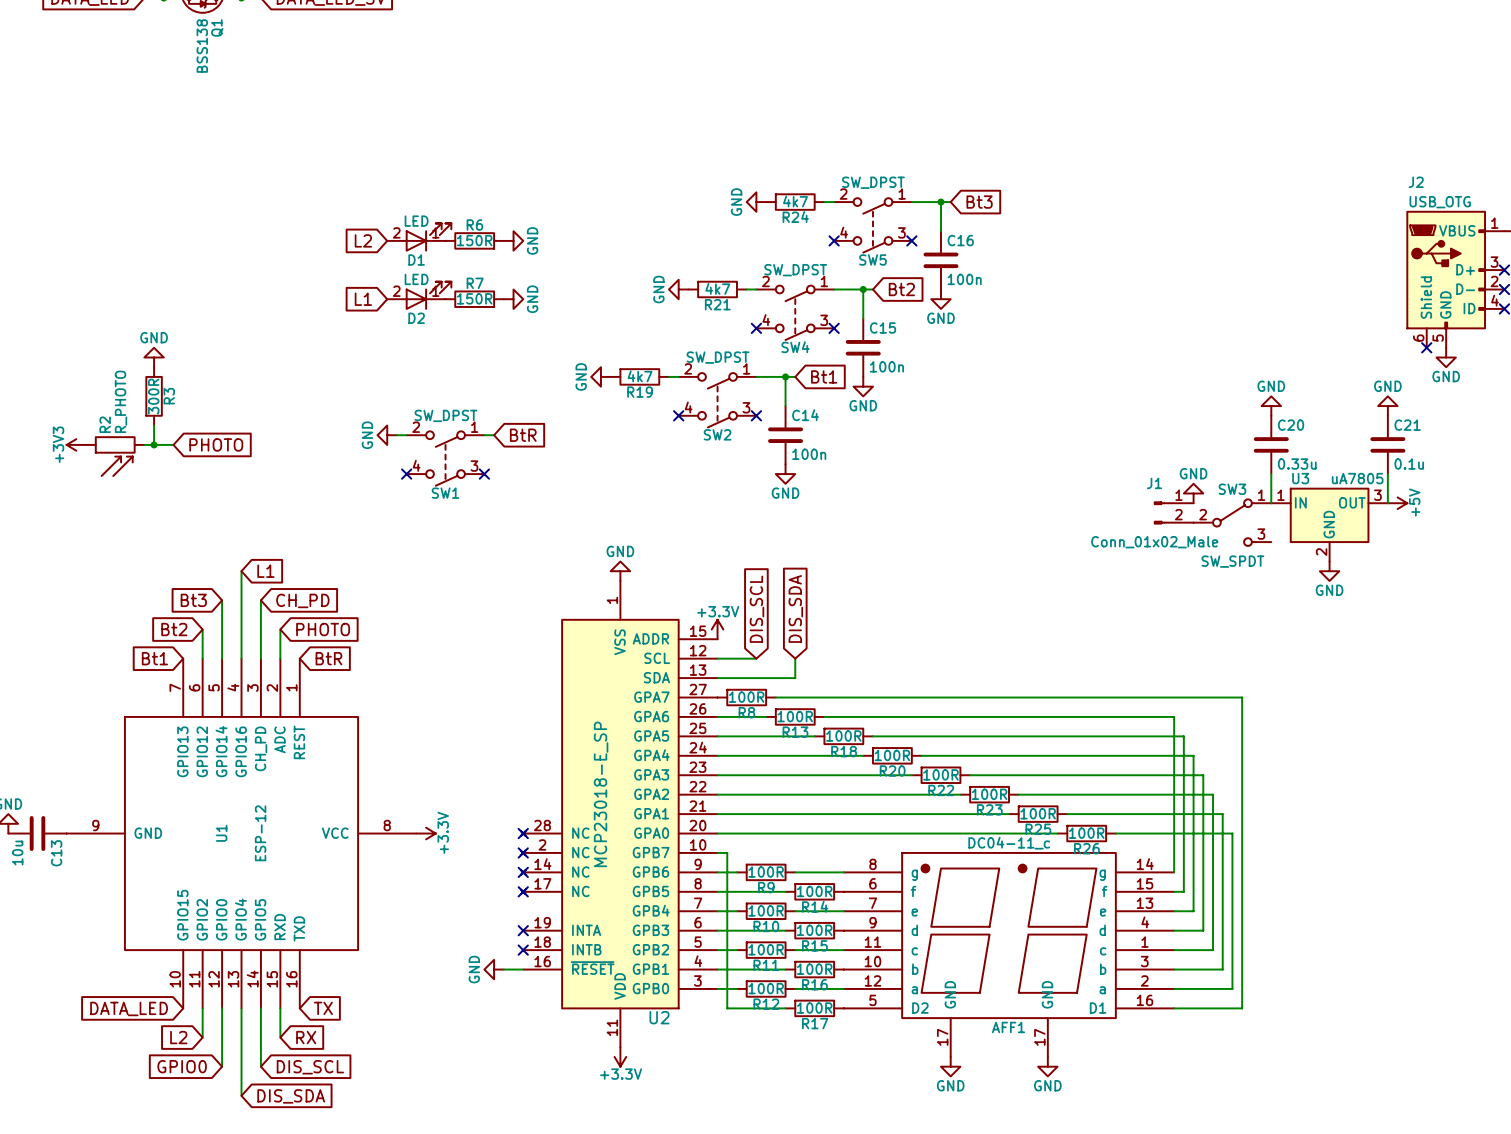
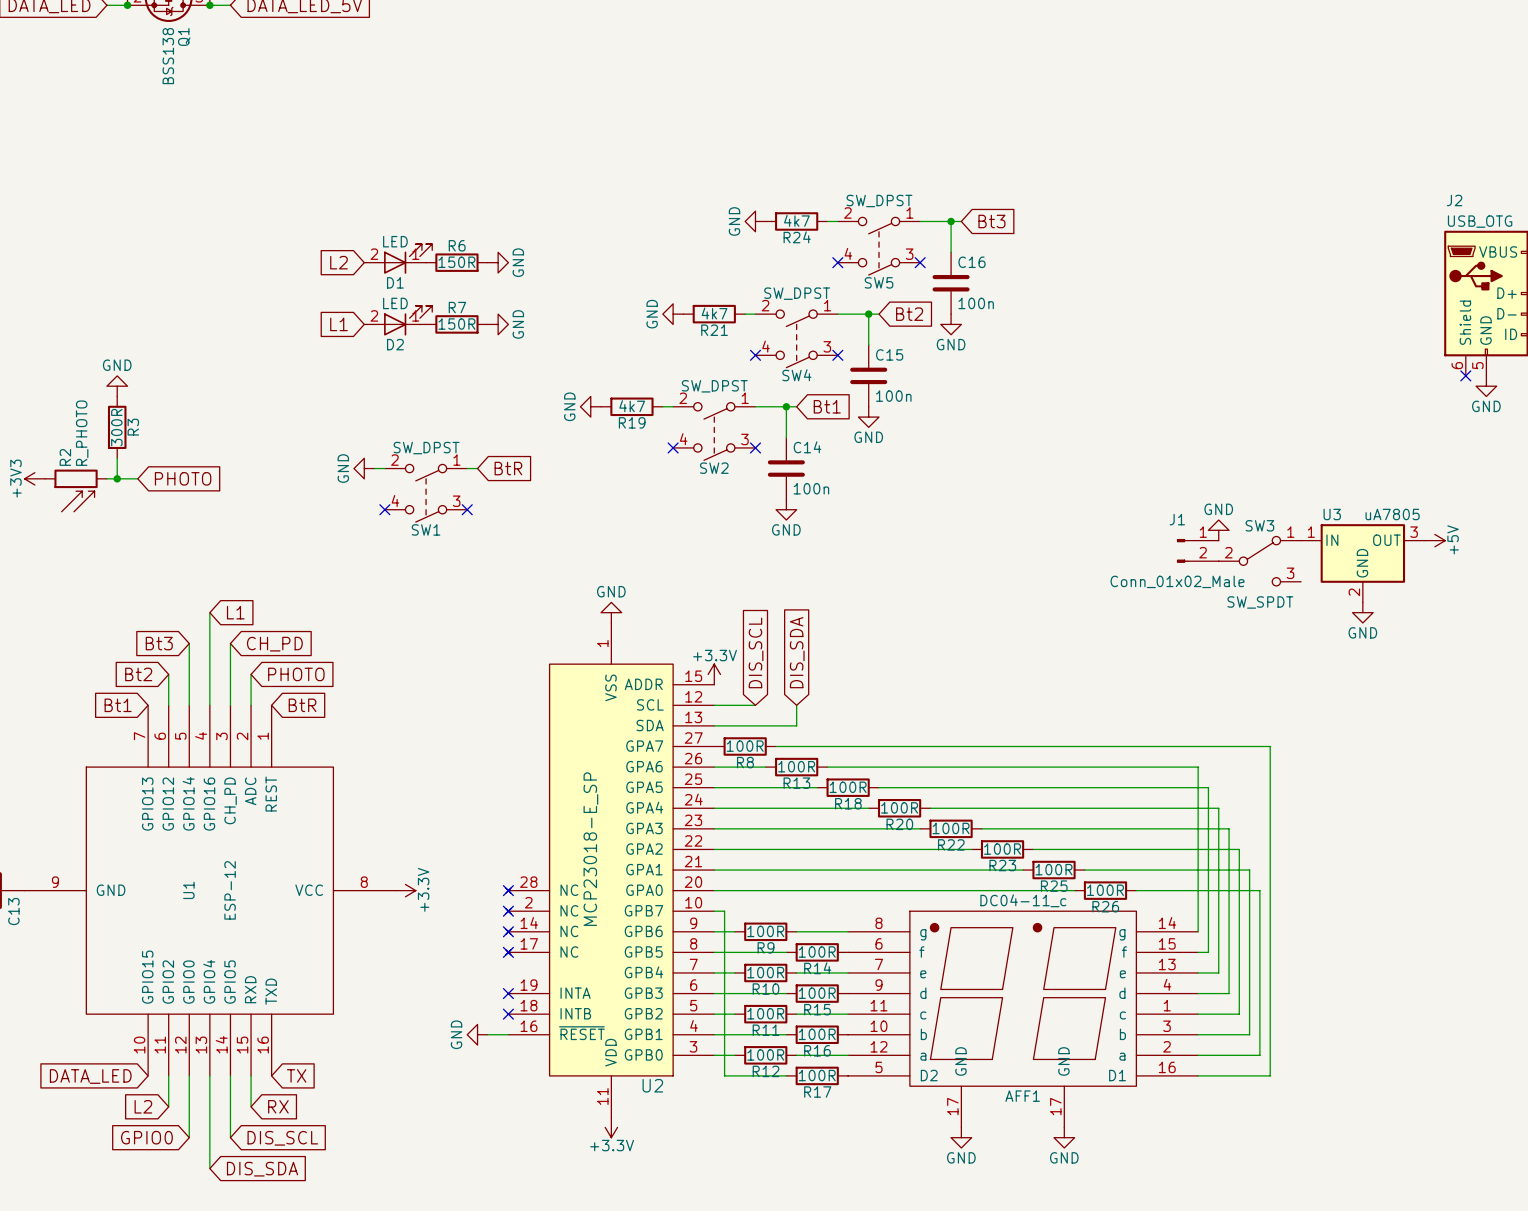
power symbol: GND (1271, 406) -> none
power symbol: GND (1387, 406) -> none
C20: 0.33u (1271, 444) -> none
C21: 0.1u (1387, 444) -> none
wire: (1271, 474) (1271, 503) -> none
wire: (1387, 474) (1387, 503) -> none

